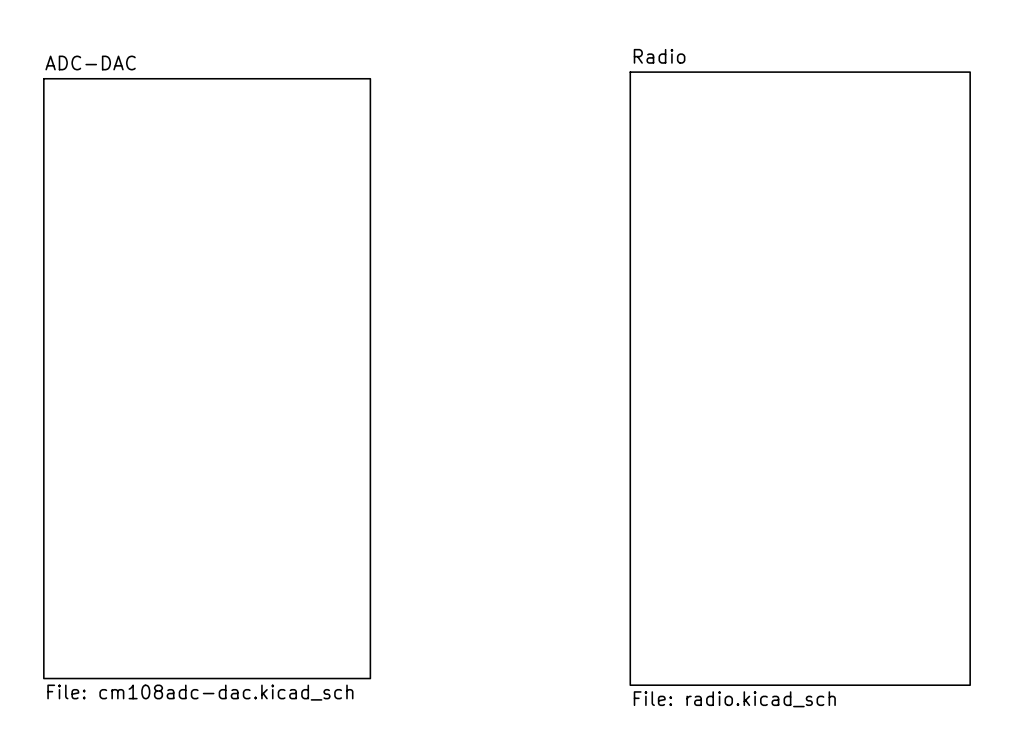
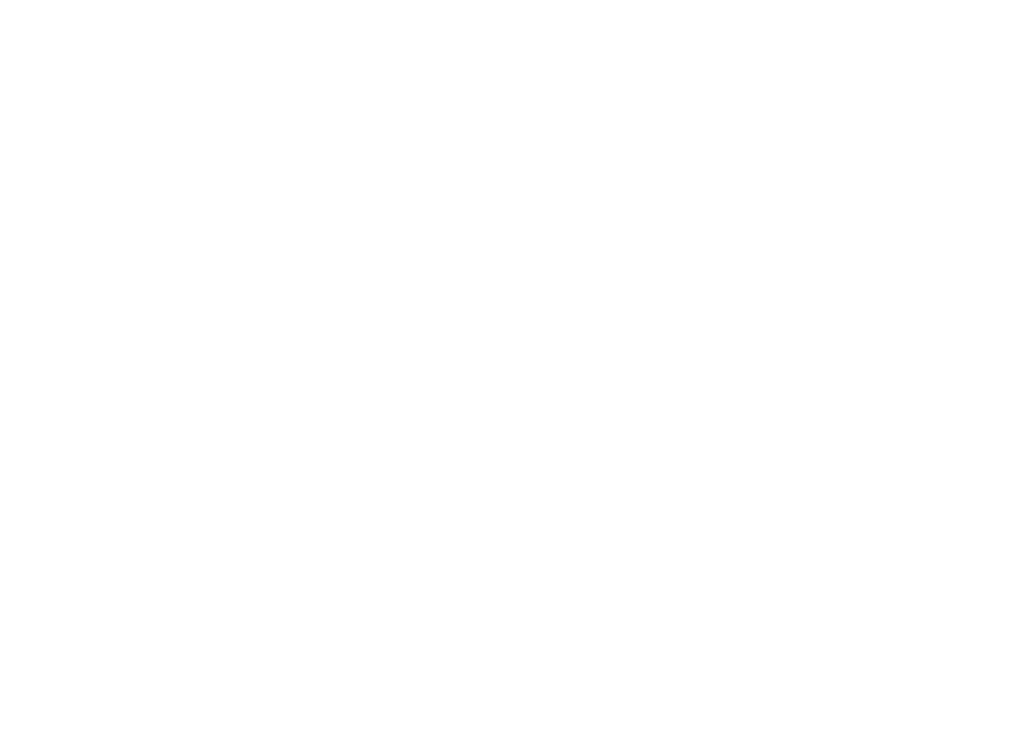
sheet ADC-DAC: File: cm108adc-dac.kicad_sch (207, 378) -> none
sheet Radio: File: radio.kicad_sch (800, 378) -> none

